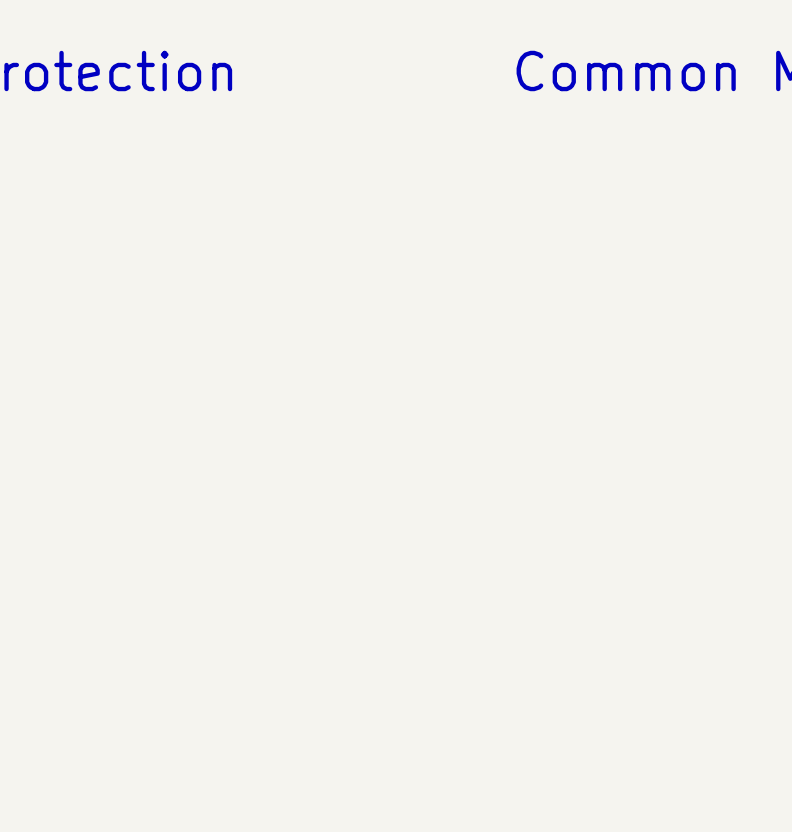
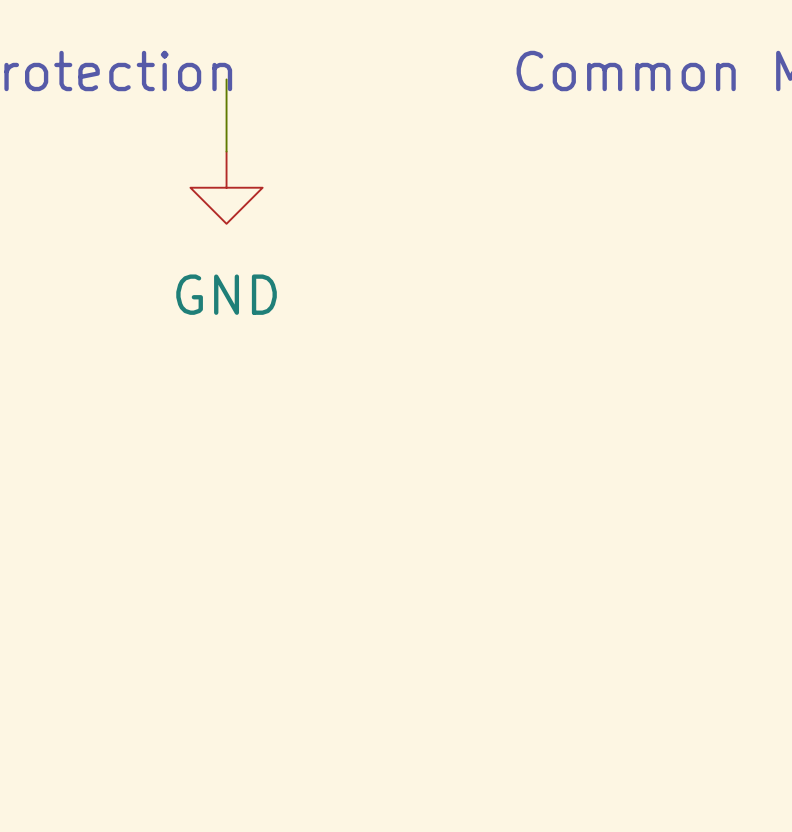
wire: none -> (226, 79) (226, 151)
power symbol: none -> GND (226, 187)

